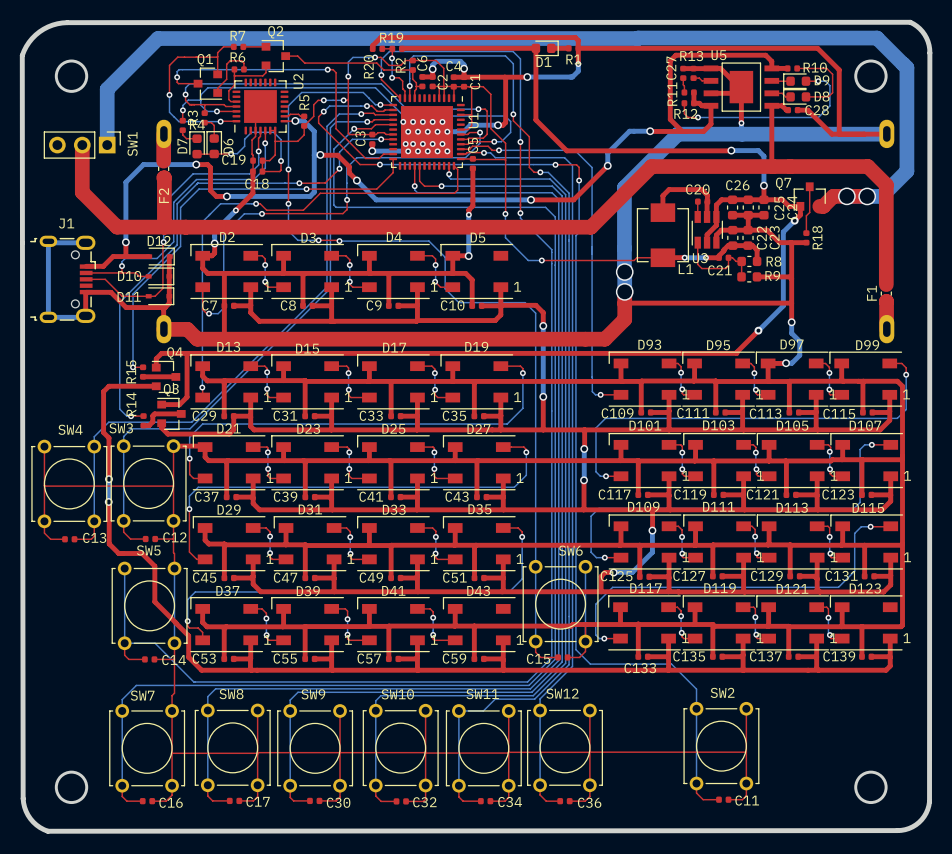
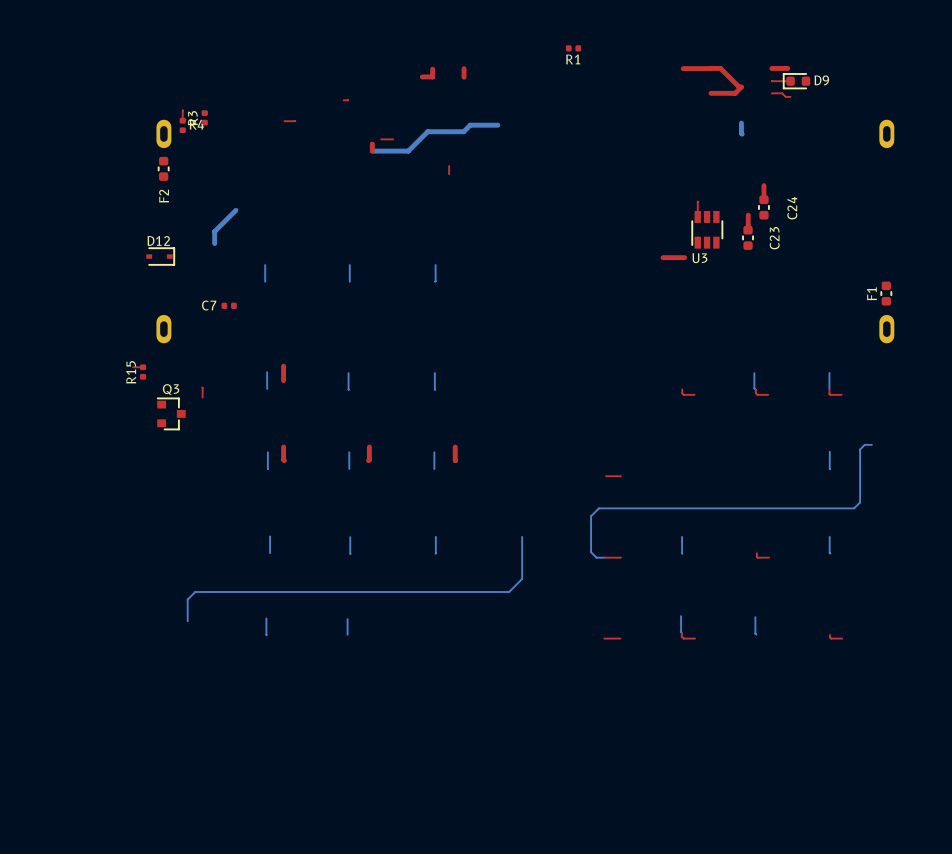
board edge: (910, 22) (67, 22) (52, 25) (35, 35) (29, 42) (22, 55) (23, 798) (26, 811) (33, 822) (47, 831) (897, 830) (909, 828) (919, 822) (926, 813) (929, 801) (929, 52) (924, 34) (910, 22) -> none
top track: (233, 46) (223, 46) (217, 52) (217, 74) -> none
R7: (238, 46) -> none
top track: (243, 46) (265, 46) -> none
top track: (372, 48) (372, 45) (380, 37) (575, 37) (578, 40) (578, 48) (817, 48) (839, 69) (839, 134) -> none
R20: (377, 48) -> none
top track: (382, 48) (392, 48) (392, 58) -> none
R19: (397, 48) -> none
top track: (401, 48) (535, 48) (535, 119) (566, 150) (731, 150) -> none
D1: (545, 48) -> none
top track: (551, 48) (568, 48) -> none
top track: (578, 48) (578, 64) -> none
top track: (217, 56) (177, 57) (169, 65) (169, 94) -> none
Q2: (275, 56) -> none
top track: (285, 56) (297, 56) (304, 63) (376, 63) (383, 70) (412, 70) (412, 79) (416, 82) (414, 98) -> none
top track: (375, 57) (381, 57) (389, 65) (400, 65) (405, 60) (436, 60) (443, 68) (444, 98) -> none
via: (375, 57) -> none
bottom track: (374, 58) (352, 57) (348, 62) (348, 76) -> none
bottom track: (392, 58) (392, 77) -> none
via: (392, 58) -> none
round board edge: [54, 59, 89, 93] -> none
round board edge: [854, 59, 888, 93] -> none
bottom track: (578, 64) (578, 71) (572, 77) (527, 77) -> none
via: (578, 64) -> none
top track: (266, 65) (266, 72) (262, 75) (234, 75) -> none
R2: (412, 65) -> none
bottom track: (464, 68) (464, 64) (460, 61) (436, 61) (432, 65) (432, 69) -> none
via: (464, 68) -> none
top track: (771, 68) (771, 61) (765, 55) (675, 55) (670, 60) (670, 119) (682, 131) -> none
R10: (792, 68) -> none
top track: (797, 68) (826, 68) (832, 74) (832, 92) (828, 96) (806, 96) -> none
top track: (234, 69) (234, 85) (228, 90) (228, 99) (236, 101) -> none
R6: (239, 69) -> none
top track: (243, 69) (243, 63) (241, 60) (230, 60) (226, 64) (226, 79) (217, 88) (217, 92) -> none
top track: (327, 69) (333, 69) (336, 72) (336, 128) (365, 158) (379, 158) (383, 154) (393, 154) -> none
bottom track: (327, 69) (179, 69) (177, 77) -> none
via: (327, 69) -> none
via: (432, 69) -> none
C27: (683, 73) -> none
R13: (693, 73) -> none
top track: (381, 75) (381, 79) (400, 98) -> none
bottom track: (381, 75) (381, 59) (389, 51) (513, 51) (520, 58) (520, 142) -> none
via: (381, 75) -> none
top track: (348, 76) (348, 133) (376, 134) (384, 132) (393, 134) -> none
via: (348, 76) -> none
top track: (177, 77) (178, 83) (198, 83) -> none
via: (177, 77) -> none
top track: (392, 77) (399, 77) (402, 81) (404, 98) -> none
via: (392, 77) -> none
top track: (504, 77) (505, 122) (502, 125) (497, 125) -> none
top track: (527, 77) (453, 77) -> none
via: (527, 77) -> none
top track: (683, 78) (684, 92) -> none
top track: (693, 78) (710, 80) -> none
C6: (422, 81) -> none
C2: (432, 81) -> none
C4: (453, 81) -> none
C1: (464, 81) -> none
top track: (806, 81) (818, 81) -> none
bottom track: (818, 81) (825, 81) (829, 85) (829, 105) (818, 117) (697, 117) -> none
via: (818, 81) -> none
Q1: (207, 83) -> none
top track: (409, 86) (409, 98) -> none
bottom track: (409, 86) (409, 59) (413, 55) (505, 55) (513, 63) (513, 114) -> none
via: (409, 86) -> none
top track: (416, 86) (422, 86) -> none
top track: (432, 86) (453, 86) (453, 98) -> none
top track: (439, 86) (439, 98) -> none
top track: (453, 86) (483, 86) (490, 94) (490, 128) (505, 143) (505, 213) -> none
top track: (471, 86) (471, 125) (467, 129) (460, 129) -> none
top track: (741, 87) (741, 123) -> none
U5: (741, 87) -> none
R11: (689, 92) -> none
top track: (693, 92) (693, 103) (710, 105) (710, 124) (703, 131) (650, 131) -> none
bottom track: (169, 94) (169, 112) (178, 121) (220, 121) -> none
via: (169, 94) -> none
top track: (185, 94) (185, 100) (189, 104) (236, 106) -> none
bottom track: (185, 94) (185, 87) (189, 83) (381, 83) (406, 109) (478, 109) -> none
via: (185, 94) -> none
D8: (796, 96) -> none
bottom track: (200, 100) (188, 100) (182, 105) (182, 110) -> none
top track: (323, 100) (318, 100) (313, 104) (313, 116) (304, 125) (304, 134) (297, 141) (275, 141) -> none
bottom track: (323, 100) (343, 100) -> none
via: (323, 100) -> none
via: (343, 100) -> none
top track: (684, 103) (684, 113) (688, 117) (697, 117) -> none
R12: (689, 103) -> none
top track: (204, 104) (204, 113) -> none
top track: (380, 104) (393, 105) -> none
bottom track: (380, 104) (375, 104) (363, 92) (301, 92) (288, 105) (288, 169) -> none
via: (380, 104) -> none
top track: (260, 106) (255, 111) (255, 136) (252, 139) (252, 193) (235, 210) -> none
U2: (260, 106) -> none
top track: (366, 106) (371, 106) (377, 111) (393, 109) -> none
bottom track: (366, 106) (329, 106) (323, 111) -> none
via: (366, 106) -> none
top track: (478, 109) (487, 111) (487, 134) (483, 138) (460, 139) -> none
via: (478, 109) -> none
via: (182, 110) -> none
top track: (788, 110) (782, 105) (771, 105) (773, 166) -> none
C28: (792, 110) -> none
top track: (797, 110) (807, 110) (831, 134) (886, 134) -> none
top track: (216, 111) (236, 111) -> none
bottom track: (216, 111) (207, 111) (200, 105) (200, 94) (207, 87) (375, 87) (403, 116) (505, 116) (510, 121) (510, 132) (501, 141) (494, 141) -> none
via: (216, 111) -> none
top track: (323, 111) (318, 116) (318, 123) (360, 164) (379, 164) -> none
via: (323, 111) -> none
top track: (361, 114) (393, 114) -> none
bottom track: (361, 114) (339, 114) (326, 126) (326, 286) (191, 422) (108, 422) (94, 436) (94, 521) -> none
via: (361, 114) -> none
top track: (460, 114) (471, 115) -> none
top track: (513, 114) (513, 120) (529, 136) (529, 167) (534, 172) (540, 172) -> none
via: (513, 114) -> none
top track: (284, 116) (298, 114) (304, 116) -> none
via: (697, 117) -> none
top track: (393, 119) (374, 119) (367, 121) (368, 120) -> none
bottom track: (295, 120) (303, 120) (314, 131) (314, 192) (310, 196) (226, 196) -> none
via: (295, 120) -> none
via: (220, 121) -> none
top track: (236, 121) (220, 121) -> none
R5: (304, 121) -> none
bottom track: (367, 121) (336, 121) (330, 127) (330, 288) (190, 428) (131, 428) (123, 436) (123, 520) -> none
via: (367, 121) -> none
via: (403, 121) -> none
via: (413, 121) -> none
via: (422, 121) -> none
via: (432, 121) -> none
via: (442, 121) -> none
top track: (204, 122) (211, 122) (214, 125) (214, 138) -> none
via: (741, 123) -> none
top track: (393, 124) (375, 124) (371, 128) (354, 128) -> none
via: (497, 125) -> none
bottom track: (354, 128) (333, 149) (333, 205) (336, 207) (545, 207) (555, 217) (555, 659) (528, 685) (136, 685) (122, 699) (122, 785) -> none
via: (354, 128) -> none
top track: (182, 130) (182, 134) (186, 138) (197, 138) -> none
top track: (260, 130) (258, 151) -> none
top track: (265, 130) (265, 143) -> none
top track: (270, 130) (275, 130) (275, 155) (269, 160) (262, 160) (262, 171) (279, 171) (281, 161) -> none
via: (408, 131) -> none
via: (417, 131) -> none
via: (427, 131) -> none
via: (437, 131) -> none
via: (447, 131) -> none
bottom track: (650, 131) (629, 131) (607, 153) (607, 165) -> none
via: (650, 131) -> none
U1: (426, 132) -> none
bottom track: (479, 132) (479, 143) (465, 157) (356, 157) (346, 167) (347, 199) -> none
top track: (480, 132) (460, 134) -> none
via: (480, 132) -> none
top track: (163, 134) (163, 161) -> none
bottom track: (886, 134) (677, 134) (624, 187) (624, 291) -> none
C3: (372, 139) -> none
bottom track: (381, 139) (352, 139) (339, 152) (339, 168) -> none
via: (381, 139) -> none
top track: (494, 141) (470, 141) (468, 144) (460, 144) -> none
via: (494, 141) -> none
top track: (520, 142) (520, 213) -> none
via: (520, 142) -> none
via: (265, 143) -> none
via: (405, 143) -> none
via: (413, 143) -> none
via: (422, 143) -> none
via: (432, 143) -> none
via: (442, 143) -> none
D7: (197, 144) -> none
D6: (214, 144) -> none
top track: (82, 145) (82, 192) (117, 227) (185, 227) -> none
SW1: (82, 145) -> none
bottom track: (107, 145) (107, 89) (158, 38) (877, 38) (906, 67) (906, 171) (881, 196) (867, 196) -> none
bottom track: (265, 146) (265, 168) (253, 179) (196, 179) (173, 202) (173, 241) (157, 258) (125, 258) (121, 261) (121, 266) -> none
top track: (460, 149) (469, 149) (472, 146) (488, 146) (492, 150) (499, 150) -> none
bottom track: (499, 150) (574, 150) (592, 167) (592, 391) (595, 394) (600, 394) -> none
via: (499, 150) -> none
bottom track: (731, 150) (758, 150) (763, 156) (763, 185) -> none
via: (731, 150) -> none
bottom track: (258, 151) (258, 164) (249, 173) (193, 173) (163, 203) (163, 242) -> none
via: (258, 151) -> none
via: (372, 151) -> none
via: (408, 151) -> none
via: (417, 151) -> none
via: (427, 151) -> none
via: (437, 151) -> none
via: (447, 151) -> none
top track: (483, 152) (460, 154) -> none
bottom track: (483, 152) (490, 152) (495, 157) (564, 157) (572, 165) (572, 666) (540, 698) (540, 785) -> none
via: (483, 152) -> none
top track: (231, 153) (197, 154) -> none
bottom track: (231, 153) (237, 153) (244, 146) (244, 139) (251, 132) (273, 132) (281, 139) (281, 161) -> none
via: (231, 153) -> none
top track: (320, 154) (337, 155) (349, 166) (349, 172) (356, 180) -> none
via: (320, 154) -> none
top track: (393, 158) (393, 172) (376, 189) (306, 189) -> none
top track: (460, 158) (505, 160) -> none
C19: (257, 160) -> none
via: (281, 161) -> none
C5: (472, 163) -> none
top track: (196, 164) (207, 164) (210, 167) (210, 190) (216, 196) (226, 196) -> none
bottom track: (196, 164) (143, 164) (125, 182) (125, 242) -> none
via: (196, 164) -> none
bottom track: (379, 164) (555, 164) -> none
via: (379, 164) -> none
top track: (555, 164) (576, 164) (579, 167) (579, 180) -> none
via: (555, 164) -> none
top track: (414, 165) (414, 186) -> none
top track: (419, 165) (419, 181) (424, 186) (441, 186) -> none
top track: (453, 165) (457, 169) (457, 190) (454, 193) (320, 193) (303, 210) (266, 210) (260, 203) (256, 203) -> none
top track: (607, 165) (573, 199) (531, 199) -> none
via: (607, 165) -> none
top track: (339, 168) (325, 182) (317, 182) -> none
via: (339, 168) -> none
top track: (472, 168) (472, 205) (468, 209) (468, 214) -> none
top track: (288, 169) (288, 203) -> none
via: (288, 169) -> none
C18: (257, 171) -> none
bottom track: (540, 172) (548, 172) (569, 193) (569, 664) (534, 699) (495, 699) (483, 710) (458, 710) (458, 785) -> none
via: (540, 172) -> none
bottom track: (449, 174) (450, 179) (550, 179) (565, 194) (565, 663) (533, 695) (380, 695) (375, 700) (375, 785) -> none
via: (449, 174) -> none
top track: (163, 177) (164, 227) -> none
bottom track: (356, 180) (376, 199) (531, 199) -> none
via: (356, 180) -> none
bottom track: (579, 180) (579, 232) (575, 235) (575, 649) (590, 664) (671, 664) (696, 689) (696, 783) -> none
via: (579, 180) -> none
bottom track: (197, 182) (177, 203) (177, 245) (119, 302) (119, 409) (126, 416) (131, 416) -> none
top track: (318, 182) (299, 183) -> none
bottom track: (197, 183) (299, 183) -> none
via: (299, 183) -> none
via: (763, 185) -> none
bottom track: (414, 186) (417, 192) (552, 192) (558, 199) (558, 660) (530, 688) (215, 688) (207, 696) (207, 785) -> none
via: (414, 186) -> none
bottom track: (441, 186) (552, 186) (562, 196) (562, 661) (531, 692) (297, 692) (290, 700) (290, 785) -> none
via: (441, 186) -> none
top track: (809, 186) (809, 212) (806, 215) (806, 233) -> none
bottom track: (306, 189) (198, 189) (180, 207) (180, 246) (133, 294) (133, 367) -> none
via: (306, 189) -> none
via: (226, 196) -> none
Q7: (809, 196) -> none
via: (846, 196) -> none
top track: (867, 196) (833, 196) (823, 206) (819, 206) -> none
via: (867, 196) -> none
top track: (347, 199) (347, 209) (342, 213) (261, 213) -> none
via: (347, 199) -> none
via: (531, 199) -> none
C20: (702, 201) -> none
bottom track: (256, 203) (220, 203) (202, 221) (202, 387) -> none
via: (256, 203) -> none
bottom track: (288, 203) (288, 230) (297, 240) (318, 240) -> none
via: (288, 203) -> none
C26: (732, 207) -> none
C25: (748, 207) -> none
via: (235, 210) -> none
top track: (662, 212) (662, 195) (669, 189) (701, 189) (707, 195) (707, 216) -> none
bottom track: (261, 213) (244, 213) (223, 234) (223, 308) (218, 313) (209, 313) -> none
via: (261, 213) -> none
bottom track: (505, 213) (505, 237) (528, 260) (541, 260) -> none
via: (505, 213) -> none
bottom track: (520, 213) (520, 218) (551, 249) (551, 657) (527, 681) (193, 681) (155, 643) (124, 643) (124, 568) -> none
via: (520, 213) -> none
bottom track: (468, 214) (468, 256) -> none
via: (468, 214) -> none
top track: (732, 215) (763, 215) -> none
top track: (794, 220) (800, 214) (800, 206) (789, 206) (782, 199) (721, 199) (716, 205) (716, 225) (707, 234) (707, 242) -> none
bottom track: (794, 220) (783, 232) (783, 305) (758, 330) -> none
via: (794, 220) -> none
top track: (185, 227) (590, 227) (651, 166) (867, 166) (886, 184) (886, 284) -> none
L1: (662, 235) -> none
C22: (732, 237) -> none
R18: (806, 237) -> none
top track: (318, 240) (339, 241) -> none
via: (318, 240) -> none
bottom track: (339, 241) (428, 241) (445, 257) (445, 288) (458, 302) (525, 302) (535, 313) (535, 641) -> none
via: (339, 241) -> none
bottom track: (85, 242) (48, 241) (48, 317) (85, 315) -> none
top track: (125, 242) (126, 256) -> none
via: (125, 242) -> none
top track: (163, 242) (162, 288) (155, 296) (122, 296) (105, 279) (86, 279) -> none
via: (163, 242) -> none
top track: (697, 242) (697, 264) (701, 268) (725, 268) (728, 266) (728, 257) (732, 257) (736, 261) (741, 261) (741, 276) -> none
top track: (716, 242) (716, 235) (721, 230) (767, 230) (779, 242) (806, 242) -> none
top track: (791, 242) (791, 322) -> none
top track: (214, 243) (214, 253) (211, 255) (202, 255) (202, 268) (207, 273) (465, 273) (472, 279) (472, 305) -> none
via: (214, 243) -> none
top track: (250, 255) (262, 255) (265, 258) (265, 265) -> none
top track: (283, 255) (283, 273) -> none
top track: (331, 255) (345, 255) (349, 259) (349, 265) -> none
top track: (369, 255) (370, 273) -> none
top track: (417, 255) (432, 255) (435, 258) (435, 265) -> none
top track: (149, 256) (113, 256) (103, 266) (86, 266) -> none
top track: (169, 256) (169, 303) (165, 307) (126, 307) (110, 292) (86, 292) (85, 315) -> none
top track: (468, 256) (452, 255) (452, 273) -> none
via: (468, 256) -> none
top track: (662, 257) (636, 257) (634, 260) (541, 260) -> none
bottom track: (684, 257) (705, 257) -> none
via: (684, 257) -> none
top track: (705, 257) (718, 257) (728, 245) (752, 245) (757, 250) (757, 261) -> none
via: (705, 257) -> none
C21: (723, 257) -> none
via: (541, 260) -> none
R8: (749, 261) -> none
via: (265, 265) -> none
via: (349, 265) -> none
via: (435, 265) -> none
top track: (121, 266) (122, 272) -> none
via: (121, 266) -> none
D2: (226, 271) -> none
D3: (307, 271) -> none
D4: (393, 271) -> none
D5: (476, 271) -> none
top track: (86, 272) (135, 272) (139, 276) (148, 276) -> none
via: (624, 272) -> none
top track: (224, 273) (223, 339) -> none
top track: (304, 273) (302, 275) (302, 305) -> none
top track: (390, 273) (388, 305) -> none
D10: (160, 276) -> none
R9: (749, 276) -> none
top track: (756, 276) (789, 276) (791, 278) -> none
J1: (63, 279) -> none
top track: (265, 281) (268, 287) (283, 287) -> none
via: (265, 281) -> none
top track: (349, 281) (352, 287) (369, 287) -> none
via: (349, 281) -> none
top track: (435, 281) (440, 287) (452, 287) -> none
via: (435, 281) -> none
top track: (202, 287) (202, 309) (209, 313) -> none
top track: (250, 287) (250, 312) (259, 321) (417, 320) -> none
top track: (331, 287) (331, 321) -> none
top track: (417, 287) (417, 320) -> none
top track: (500, 287) (500, 314) (495, 320) (417, 320) -> none
top track: (624, 291) (624, 319) (605, 339) (197, 339) (187, 329) (163, 329) (163, 309) (161, 307) -> none
via: (624, 291) -> none
D11: (160, 296) -> none
top track: (886, 301) (886, 329) -> none
top track: (791, 303) (624, 303) -> none
top track: (417, 304) (398, 305) -> none
top track: (250, 305) (233, 305) -> none
C8: (307, 305) -> none
top track: (312, 305) (331, 306) -> none
C9: (393, 305) -> none
C10: (476, 305) -> none
top track: (481, 305) (535, 305) (543, 312) (543, 325) -> none
via: (209, 313) -> none
bottom track: (791, 322) (791, 333) (799, 341) (799, 355) (791, 363) (786, 363) -> none
via: (791, 322) -> none
bottom track: (543, 325) (543, 396) -> none
via: (543, 325) -> none
top track: (758, 330) (736, 353) (161, 353) (156, 358) (156, 367) -> none
via: (758, 330) -> none
top track: (187, 353) (187, 397) (179, 404) (161, 404) -> none
top track: (620, 363) (622, 381) -> none
top track: (669, 363) (677, 363) (681, 366) (681, 372) -> none
top track: (694, 363) (693, 381) -> none
top track: (742, 363) (750, 363) (754, 367) (754, 373) -> none
top track: (786, 363) (768, 363) (769, 381) -> none
via: (786, 363) -> none
top track: (816, 363) (825, 363) (829, 367) (829, 372) -> none
top track: (841, 363) (843, 381) -> none
top track: (889, 363) (901, 363) (906, 367) (906, 374) -> none
top track: (202, 366) (202, 376) (207, 380) (224, 380) -> none
top track: (250, 366) (264, 366) (267, 372) -> none
top track: (331, 366) (346, 366) (348, 373) -> none
top track: (369, 366) (368, 381) -> none
top track: (417, 366) (431, 366) (434, 369) (434, 373) -> none
top track: (452, 366) (452, 381) -> none
top track: (500, 366) (520, 366) (522, 373) -> none
via: (133, 367) -> none
via: (267, 372) -> none
bottom track: (681, 372) (682, 389) -> none
via: (681, 372) -> none
via: (829, 372) -> none
via: (348, 373) -> none
via: (434, 373) -> none
bottom track: (522, 373) (522, 408) (507, 424) (202, 424) (189, 437) (189, 458) -> none
via: (522, 373) -> none
via: (754, 373) -> none
bottom track: (906, 374) (906, 409) (897, 418) (605, 418) (595, 427) (595, 471) (600, 476) (606, 476) -> none
via: (906, 374) -> none
Q4: (166, 376) -> none
top track: (175, 376) (143, 376) -> none
D93: (645, 379) -> none
D95: (718, 379) -> none
D97: (792, 379) -> none
D99: (865, 379) -> none
top track: (224, 380) (224, 416) -> none
top track: (305, 380) (305, 416) -> none
top track: (305, 380) (641, 381) -> none
top track: (305, 380) (224, 380) -> none
D13: (226, 381) -> none
D15: (307, 381) -> none
top track: (391, 381) (391, 416) -> none
D17: (393, 381) -> none
top track: (472, 381) (474, 416) -> none
D19: (476, 381) -> none
top track: (641, 381) (641, 412) -> none
top track: (715, 381) (789, 381) -> none
top track: (715, 381) (715, 412) -> none
top track: (715, 381) (641, 381) -> none
top track: (789, 381) (897, 381) (902, 386) (902, 625) (788, 626) -> none
top track: (789, 381) (789, 412) -> none
top track: (863, 381) (862, 412) -> none
top track: (156, 386) (108, 386) (103, 391) (103, 432) (108, 438) (108, 479) -> none
via: (202, 387) -> none
top track: (267, 388) (267, 395) (269, 397) (283, 397) -> none
via: (267, 388) -> none
top track: (348, 389) (350, 397) (369, 397) -> none
via: (348, 389) -> none
top track: (435, 389) (435, 394) (437, 397) (452, 397) -> none
via: (435, 389) -> none
via: (682, 389) -> none
via: (755, 389) -> none
via: (829, 389) -> none
top track: (600, 394) (620, 394) -> none
via: (600, 394) -> none
top track: (669, 394) (669, 429) -> none
top track: (742, 394) (743, 429) -> none
top track: (816, 394) (817, 429) -> none
top track: (889, 394) (889, 420) (880, 429) (254, 429) (250, 426) (250, 397) -> none
top track: (543, 396) (543, 429) -> none
via: (543, 396) -> none
top track: (331, 397) (331, 429) -> none
top track: (417, 397) (416, 429) -> none
top track: (500, 397) (500, 429) -> none
top track: (669, 411) (650, 412) -> none
top track: (742, 411) (725, 412) -> none
top track: (889, 411) (872, 412) -> none
C109: (646, 412) -> none
C111: (720, 412) -> none
C113: (794, 412) -> none
top track: (816, 412) (798, 412) -> none
C115: (867, 412) -> none
top track: (181, 413) (154, 413) (152, 421) (149, 425) (143, 425) -> none
top track: (500, 415) (483, 416) -> none
top track: (131, 416) (143, 416) -> none
via: (131, 416) -> none
C29: (228, 416) -> none
C31: (309, 416) -> none
top track: (314, 416) (331, 416) -> none
C33: (395, 416) -> none
top track: (400, 416) (417, 416) -> none
C35: (479, 416) -> none
top track: (250, 417) (233, 416) (233, 429) (229, 434) (167, 434) (161, 427) (161, 423) -> none
R14: (143, 420) -> none
top track: (584, 429) (584, 448) -> none
top track: (620, 444) (620, 460) -> none
top track: (669, 444) (680, 444) (682, 452) -> none
top track: (695, 444) (694, 460) -> none
top track: (743, 444) (753, 444) (755, 447) (755, 452) -> none
top track: (769, 444) (768, 460) -> none
top track: (817, 444) (828, 444) (830, 447) (829, 451) -> none
top track: (842, 444) (842, 459) -> none
top track: (871, 444) (890, 444) -> none
via: (871, 444) -> none
top track: (44, 446) (44, 533) (50, 539) (64, 539) -> none
top track: (253, 447) (267, 447) (267, 452) -> none
top track: (331, 447) (347, 447) (349, 452) -> none
top track: (417, 447) (433, 447) (434, 452) -> none
top track: (503, 447) (523, 447) (526, 452) -> none
bottom track: (584, 448) (584, 480) -> none
via: (584, 448) -> none
via: (829, 451) -> none
via: (267, 452) -> none
via: (349, 452) -> none
via: (434, 452) -> none
bottom track: (526, 452) (526, 475) (514, 487) (198, 487) (189, 496) (189, 509) -> none
via: (526, 452) -> none
bottom track: (682, 452) (682, 469) -> none
via: (682, 452) -> none
bottom track: (755, 452) (756, 469) -> none
via: (755, 452) -> none
top track: (189, 458) (189, 474) (193, 478) (205, 478) -> none
via: (189, 458) -> none
top track: (861, 459) (861, 494) -> none
top track: (902, 459) (638, 460) -> none
top track: (228, 460) (226, 497) -> none
top track: (303, 460) (305, 462) (305, 497) -> none
top track: (389, 460) (390, 497) -> none
top track: (477, 460) (476, 497) -> none
top track: (638, 460) (638, 494) -> none
top track: (638, 460) (208, 460) (205, 457) (204, 446) (173, 446) (174, 568) -> none
D101: (645, 460) -> none
top track: (713, 460) (713, 494) -> none
D103: (719, 460) -> none
top track: (785, 460) (786, 494) -> none
D105: (793, 460) -> none
D107: (866, 460) -> none
D21: (229, 462) -> none
D23: (307, 462) -> none
D25: (393, 462) -> none
D27: (479, 462) -> none
top track: (268, 468) (268, 476) (270, 478) (283, 478) -> none
via: (268, 468) -> none
top track: (349, 468) (349, 476) (351, 478) (369, 478) -> none
via: (349, 468) -> none
top track: (434, 468) (434, 476) (436, 478) (455, 478) -> none
via: (434, 468) -> none
top track: (682, 469) (684, 476) (695, 476) -> none
via: (682, 469) -> none
top track: (756, 469) (758, 476) (769, 476) -> none
via: (756, 469) -> none
top track: (830, 469) (830, 473) (832, 476) (842, 476) -> none
via: (830, 469) -> none
via: (606, 476) -> none
top track: (669, 476) (670, 509) -> none
top track: (743, 476) (744, 509) -> none
top track: (817, 476) (817, 509) -> none
top track: (890, 476) (890, 501) (882, 509) (259, 509) (253, 503) (253, 478) -> none
top track: (331, 478) (332, 509) -> none
top track: (417, 478) (416, 509) -> none
top track: (503, 478) (503, 509) -> none
bottom track: (108, 479) (108, 502) -> none
via: (108, 479) -> none
top track: (584, 480) (583, 509) -> none
via: (584, 480) -> none
SW4: (69, 483) -> none
SW3: (148, 483) -> none
top track: (44, 485) (173, 486) -> none
C117: (643, 494) -> none
top track: (647, 494) (669, 495) -> none
C119: (718, 494) -> none
top track: (723, 494) (743, 495) -> none
C121: (791, 494) -> none
top track: (795, 494) (817, 495) -> none
C123: (866, 494) -> none
top track: (871, 494) (890, 495) -> none
top track: (503, 496) (486, 497) -> none
C37: (231, 497) -> none
top track: (236, 497) (253, 498) -> none
C39: (310, 497) -> none
top track: (314, 497) (329, 497) (331, 498) -> none
C41: (395, 497) -> none
top track: (400, 497) (417, 497) -> none
C43: (481, 497) -> none
top track: (108, 502) (109, 543) (118, 553) (142, 553) (154, 566) (154, 601) (188, 635) (188, 657) (201, 670) (886, 670) (890, 666) (890, 638) -> none
via: (108, 502) -> none
top track: (189, 509) (189, 552) (196, 559) (205, 559) -> none
via: (189, 509) -> none
top track: (652, 509) (652, 530) -> none
top track: (123, 520) (123, 532) (130, 539) (145, 539) -> none
top track: (94, 521) (94, 536) (91, 539) (74, 539) -> none
top track: (620, 526) (619, 545) -> none
top track: (669, 526) (678, 526) (682, 529) (682, 536) -> none
top track: (695, 526) (694, 545) -> none
top track: (743, 526) (751, 526) (755, 529) (755, 536) -> none
top track: (769, 526) (768, 544) -> none
top track: (817, 526) (827, 526) (829, 536) -> none
top track: (842, 526) (841, 545) -> none
bottom track: (870, 526) (861, 526) (854, 533) (854, 571) (838, 587) (612, 587) (595, 604) (595, 634) (599, 638) (604, 638) -> none
via: (870, 526) -> none
top track: (890, 526) (870, 526) -> none
top track: (205, 527) (205, 540) (208, 544) (224, 544) -> none
top track: (253, 527) (266, 527) (270, 531) (270, 536) -> none
top track: (286, 527) (285, 544) -> none
top track: (334, 527) (346, 527) (350, 531) (350, 537) -> none
top track: (369, 527) (369, 545) -> none
top track: (417, 527) (432, 527) (435, 531) (435, 536) -> none
top track: (455, 527) (454, 545) -> none
top track: (503, 527) (518, 527) (522, 531) (522, 536) -> none
bottom track: (652, 530) (652, 552) (632, 572) (613, 572) -> none
via: (652, 530) -> none
via: (270, 536) -> none
via: (435, 536) -> none
via: (522, 536) -> none
via: (682, 536) -> none
bottom track: (755, 536) (755, 551) (756, 553) -> none
via: (755, 536) -> none
via: (829, 536) -> none
via: (350, 537) -> none
top track: (173, 538) (155, 539) -> none
C13: (69, 539) -> none
C12: (150, 539) -> none
D109: (645, 541) -> none
D111: (719, 541) -> none
D113: (793, 541) -> none
D115: (866, 541) -> none
D29: (229, 543) -> none
D31: (310, 543) -> none
D33: (393, 543) -> none
D35: (479, 543) -> none
top track: (224, 544) (305, 544) -> none
top track: (224, 544) (224, 578) -> none
top track: (305, 544) (391, 545) -> none
top track: (305, 544) (305, 578) -> none
top track: (790, 544) (790, 576) -> none
top track: (790, 544) (712, 545) -> none
top track: (902, 544) (790, 544) -> none
top track: (391, 545) (639, 545) (639, 576) -> none
top track: (391, 545) (391, 578) -> none
top track: (475, 545) (474, 578) -> none
top track: (639, 545) (712, 545) -> none
top track: (712, 545) (712, 576) -> none
top track: (864, 545) (864, 576) -> none
top track: (270, 553) (272, 559) (286, 559) -> none
via: (270, 553) -> none
top track: (350, 553) (351, 559) (369, 559) -> none
via: (350, 553) -> none
top track: (435, 553) (437, 559) (455, 559) -> none
via: (435, 553) -> none
top track: (682, 553) (683, 557) (695, 557) -> none
via: (682, 553) -> none
via: (756, 553) -> none
top track: (830, 553) (831, 557) (842, 557) -> none
via: (830, 553) -> none
via: (604, 557) -> none
top track: (669, 557) (668, 591) -> none
top track: (743, 557) (744, 591) -> none
top track: (817, 557) (817, 589) (819, 591) -> none
top track: (890, 557) (890, 584) (883, 591) (260, 591) (253, 584) (253, 559) -> none
top track: (334, 559) (334, 591) -> none
top track: (417, 559) (417, 591) -> none
top track: (503, 559) (502, 591) -> none
bottom track: (585, 566) (585, 641) -> none
bottom track: (174, 568) (174, 643) -> none
top track: (613, 572) (605, 572) (601, 576) (601, 591) -> none
via: (613, 572) -> none
top track: (890, 575) (874, 576) -> none
top track: (253, 576) (233, 578) -> none
top track: (417, 576) (415, 578) (400, 578) -> none
C125: (644, 576) -> none
top track: (649, 576) (669, 577) -> none
C127: (717, 576) -> none
top track: (722, 576) (743, 577) -> none
C129: (794, 576) -> none
top track: (799, 576) (814, 576) (817, 579) -> none
C131: (869, 576) -> none
C45: (229, 578) -> none
C47: (310, 578) -> none
top track: (314, 578) (334, 578) -> none
C49: (395, 578) -> none
C51: (479, 578) -> none
top track: (484, 578) (503, 578) -> none
SW6: (560, 604) -> none
SW5: (149, 605) -> none
top track: (620, 607) (620, 624) -> none
top track: (668, 607) (677, 607) (681, 610) (681, 616) -> none
top track: (695, 607) (694, 624) -> none
top track: (743, 607) (753, 607) (755, 617) -> none
top track: (768, 607) (768, 626) -> none
top track: (816, 607) (826, 607) (828, 617) -> none
top track: (842, 607) (841, 626) -> none
top track: (202, 608) (202, 622) (207, 626) (305, 626) -> none
top track: (250, 608) (261, 608) (266, 613) (266, 618) -> none
top track: (283, 608) (282, 626) -> none
top track: (331, 608) (345, 608) (347, 611) (347, 619) -> none
top track: (369, 608) (369, 626) (305, 626) -> none
top track: (417, 608) (430, 608) (433, 611) (433, 617) -> none
top track: (455, 608) (454, 626) -> none
via: (681, 616) -> none
bottom track: (433, 617) (433, 634) -> none
via: (433, 617) -> none
via: (755, 617) -> none
bottom track: (828, 617) (829, 635) -> none
via: (828, 617) -> none
via: (266, 618) -> none
via: (347, 619) -> none
top track: (187, 621) (189, 628) (198, 628) (202, 632) (202, 640) -> none
via: (187, 621) -> none
D117: (644, 622) -> none
D119: (719, 622) -> none
D121: (792, 622) -> none
D123: (866, 622) -> none
D37: (226, 624) -> none
D39: (307, 624) -> none
D41: (393, 624) -> none
D43: (479, 624) -> none
top track: (585, 624) (585, 651) (579, 657) (567, 657) -> none
top track: (638, 624) (638, 656) -> none
top track: (712, 624) (714, 626) (788, 626) -> none
top track: (712, 624) (712, 656) -> none
top track: (712, 624) (388, 626) -> none
top track: (226, 626) (224, 628) (224, 658) -> none
top track: (305, 626) (305, 658) -> none
top track: (369, 626) (388, 626) -> none
top track: (388, 626) (388, 658) -> none
top track: (474, 626) (474, 658) -> none
top track: (788, 626) (788, 656) -> none
top track: (861, 626) (861, 656) -> none
via: (681, 632) -> none
top track: (347, 634) (349, 640) (369, 640) -> none
via: (347, 634) -> none
top track: (433, 634) (434, 640) (455, 640) -> none
via: (433, 634) -> none
top track: (756, 634) (757, 638) (768, 638) -> none
via: (756, 634) -> none
top track: (266, 635) (268, 640) (283, 640) -> none
via: (266, 635) -> none
via: (829, 635) -> none
via: (604, 638) -> none
top track: (668, 638) (668, 670) -> none
top track: (743, 638) (743, 670) -> none
top track: (816, 638) (816, 668) (818, 670) -> none
top track: (250, 640) (250, 658) -> none
top track: (331, 640) (332, 670) -> none
top track: (417, 640) (417, 670) -> none
top track: (503, 640) (503, 670) -> none
top track: (535, 641) (535, 652) (540, 657) (558, 657) -> none
top track: (124, 643) (124, 655) (128, 659) (144, 659) -> none
top track: (174, 643) (174, 693) (172, 695) (172, 795) (166, 801) (152, 801) -> none
top track: (743, 655) (741, 656) (722, 656) -> none
C133: (643, 656) -> none
top track: (668, 656) (647, 656) -> none
C135: (717, 656) -> none
C137: (793, 656) -> none
top track: (798, 656) (816, 656) -> none
C139: (866, 656) -> none
top track: (871, 656) (890, 657) -> none
top track: (331, 657) (314, 658) -> none
top track: (417, 657) (415, 658) (398, 658) -> none
C15: (562, 657) -> none
C53: (228, 658) -> none
top track: (233, 658) (250, 658) -> none
top track: (250, 658) (251, 670) -> none
C55: (309, 658) -> none
C57: (393, 658) -> none
C59: (479, 658) -> none
top track: (483, 658) (503, 660) -> none
C14: (149, 659) -> none
top track: (174, 659) (154, 659) -> none
top track: (746, 708) (746, 795) (742, 799) (728, 799) -> none
top track: (257, 710) (257, 796) (253, 800) (239, 800) -> none
top track: (340, 710) (340, 797) (336, 800) (319, 800) -> none
top track: (425, 710) (425, 799) (423, 801) (406, 801) -> none
top track: (508, 710) (508, 797) (505, 801) (490, 801) -> none
top track: (589, 710) (589, 796) (585, 801) (569, 801) -> none
SW2: (721, 746) -> none
SW8: (232, 747) -> none
SW12: (564, 747) -> none
SW7: (147, 748) -> none
SW9: (315, 748) -> none
SW10: (400, 748) -> none
SW11: (483, 748) -> none
top track: (425, 751) (257, 752) -> none
top track: (746, 752) (425, 753) -> none
top track: (172, 753) (257, 754) -> none
round board edge: [54, 770, 89, 805] -> none
round board edge: [854, 770, 888, 805] -> none
top track: (696, 783) (696, 793) (703, 799) (718, 799) -> none
top track: (122, 785) (122, 796) (126, 801) (142, 801) -> none
top track: (207, 785) (207, 796) (212, 800) (229, 800) -> none
top track: (290, 785) (290, 797) (293, 800) (309, 800) -> none
top track: (375, 785) (375, 796) (381, 801) (396, 801) -> none
top track: (458, 785) (458, 797) (463, 801) (480, 801) -> none
top track: (540, 785) (540, 795) (546, 801) (560, 801) -> none
C11: (723, 799) -> none
C17: (234, 800) -> none
C30: (314, 800) -> none
C16: (147, 801) -> none
C32: (401, 801) -> none
C34: (485, 801) -> none
C36: (564, 801) -> none

